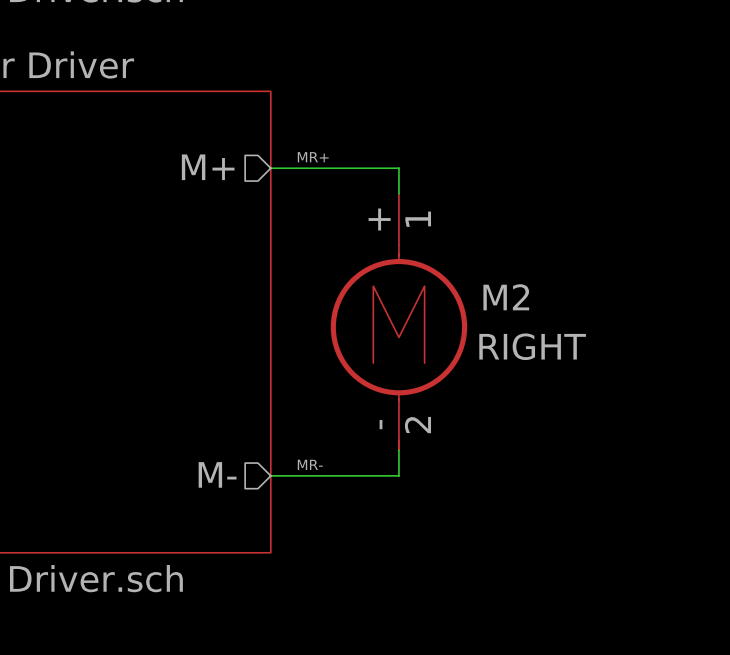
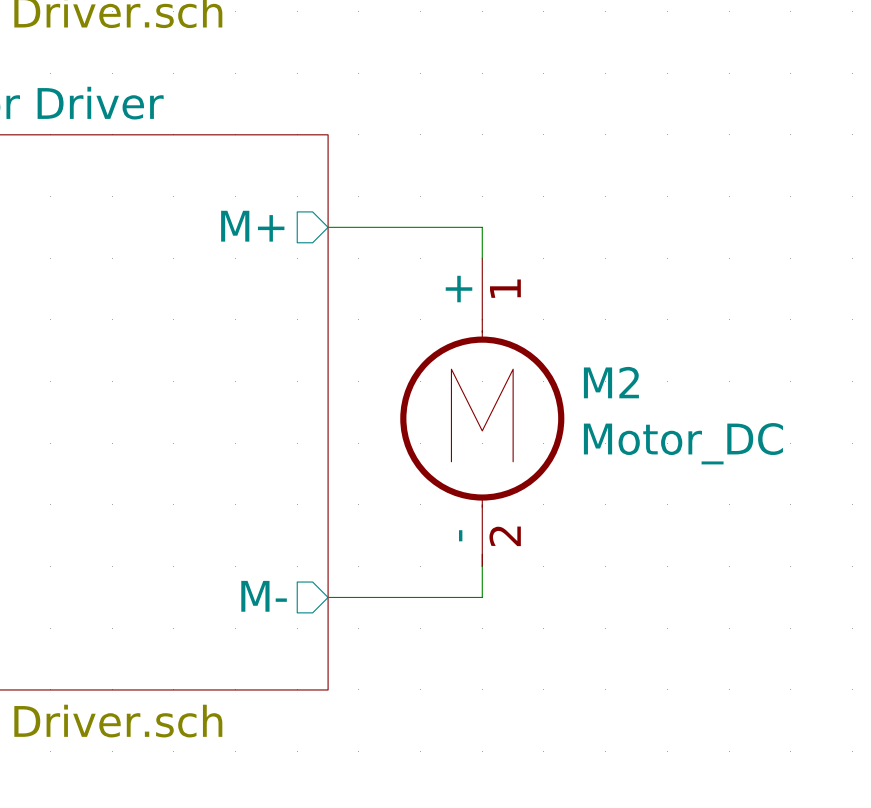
label: MR+ (313, 157) -> none
M2 text: RIGHT (532, 346) -> none
M2 value: none -> Motor_DC (683, 443)
label: MR- (310, 464) -> none

